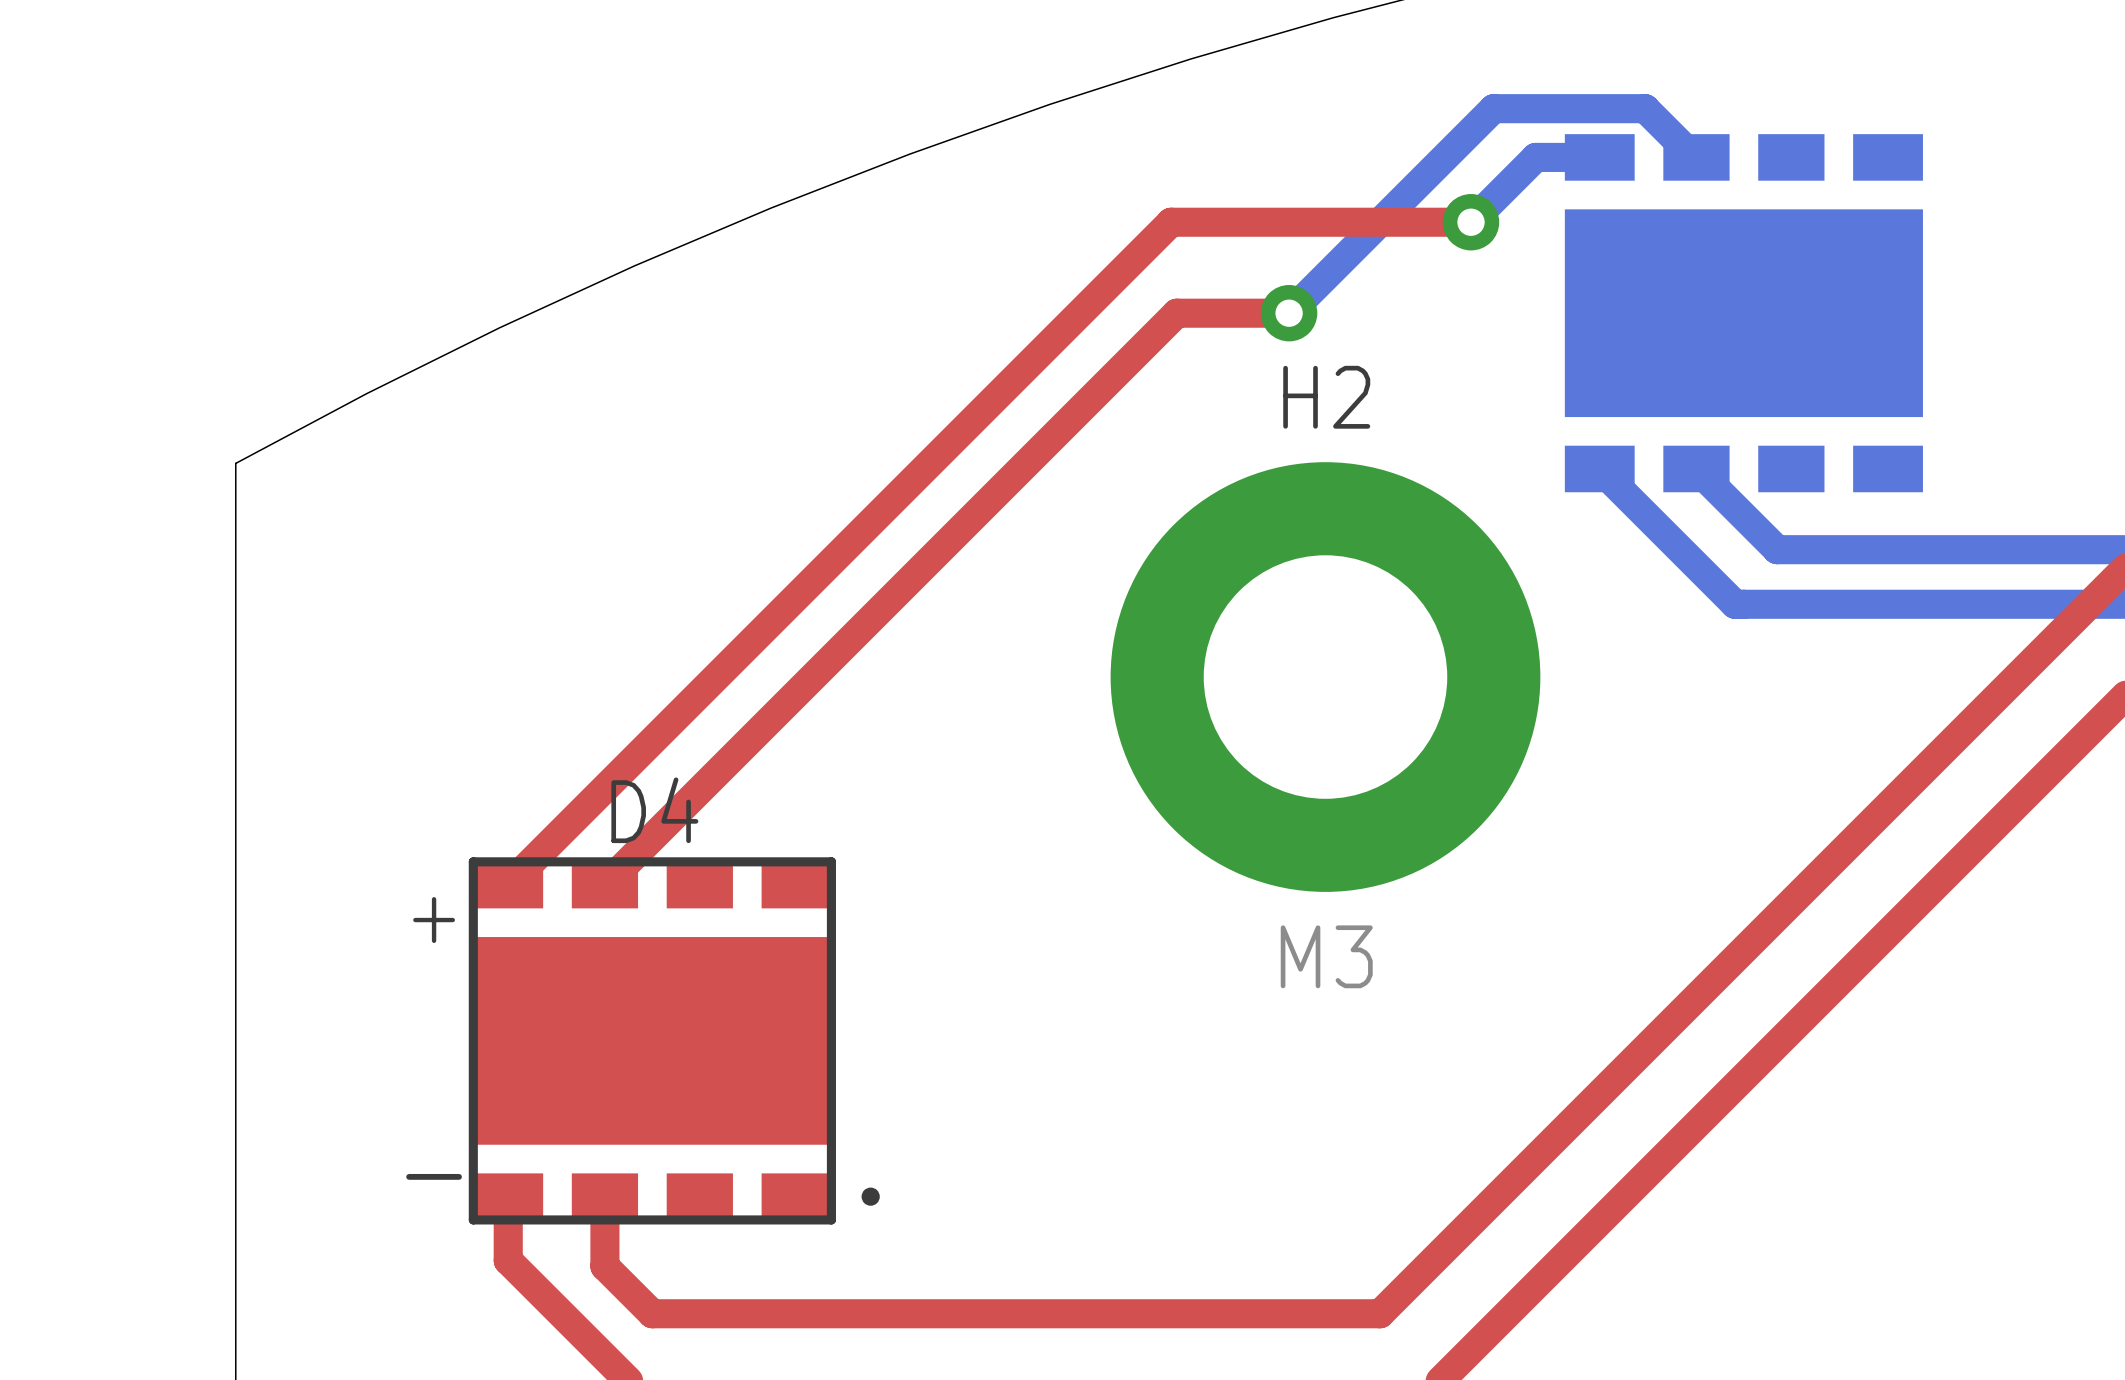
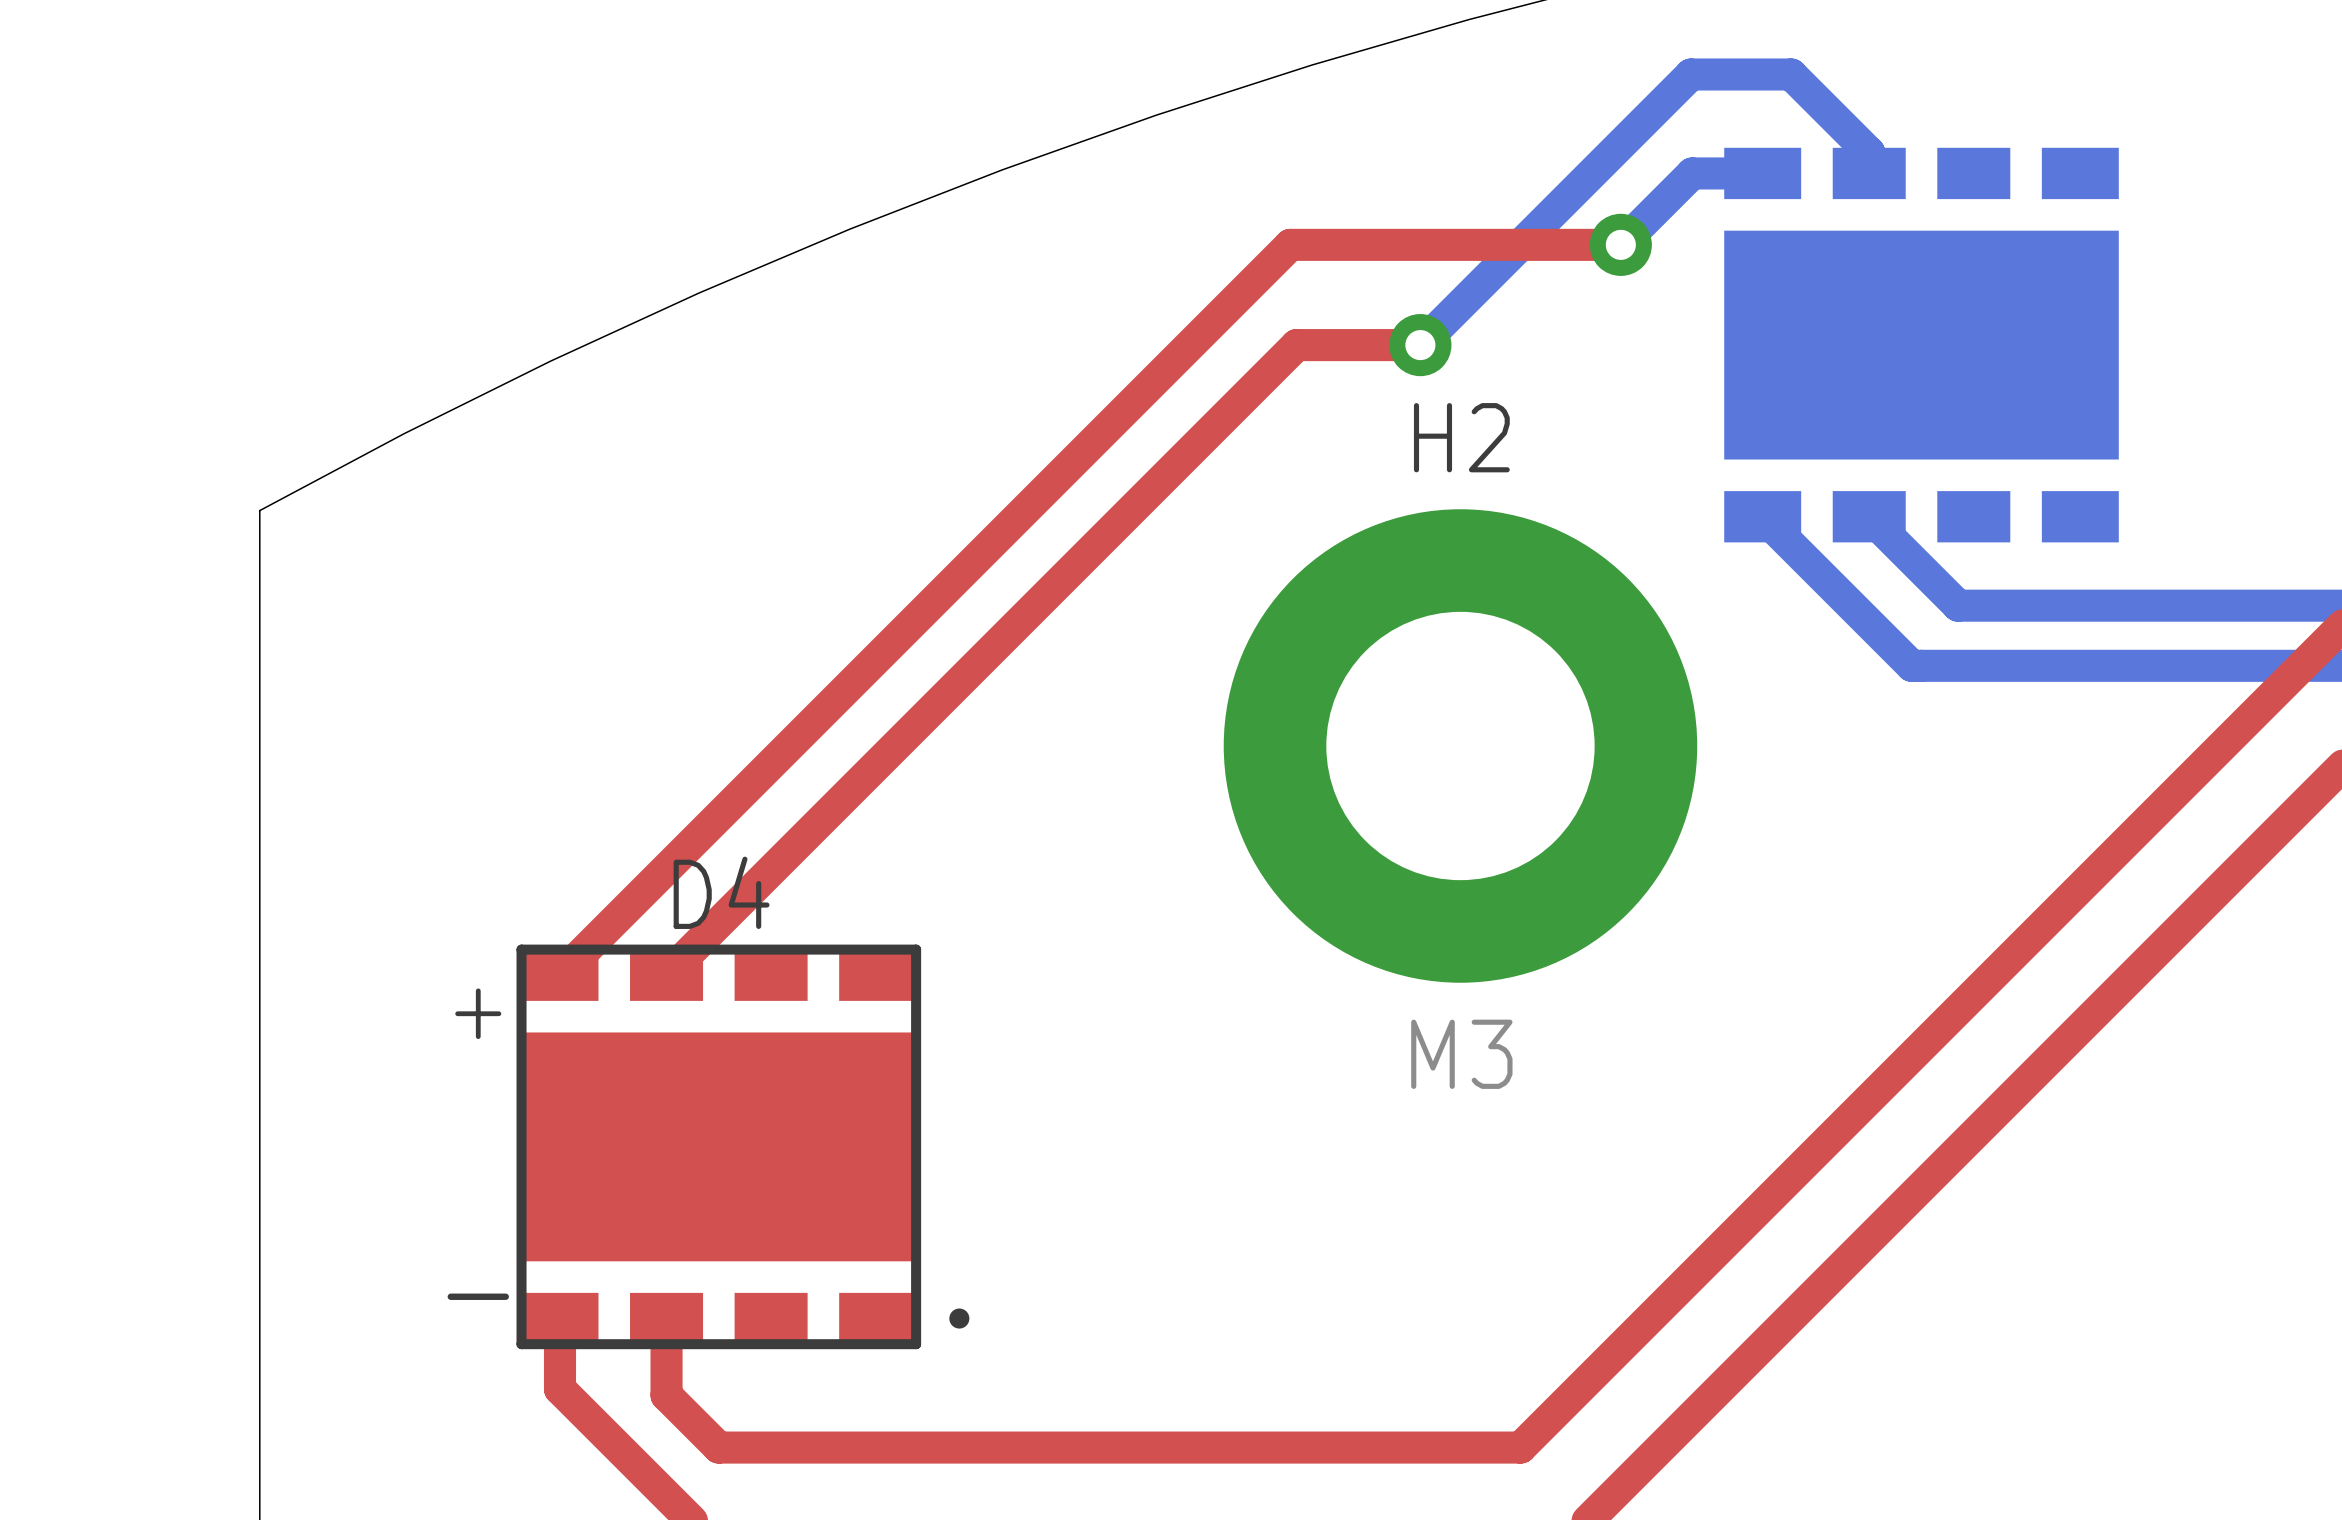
bottom track: (1493, 108) (1645, 108) (1693, 157) (1696, 157) -> (1645, 119) (1690, 74) (1791, 74) (1869, 152) (1869, 173)

